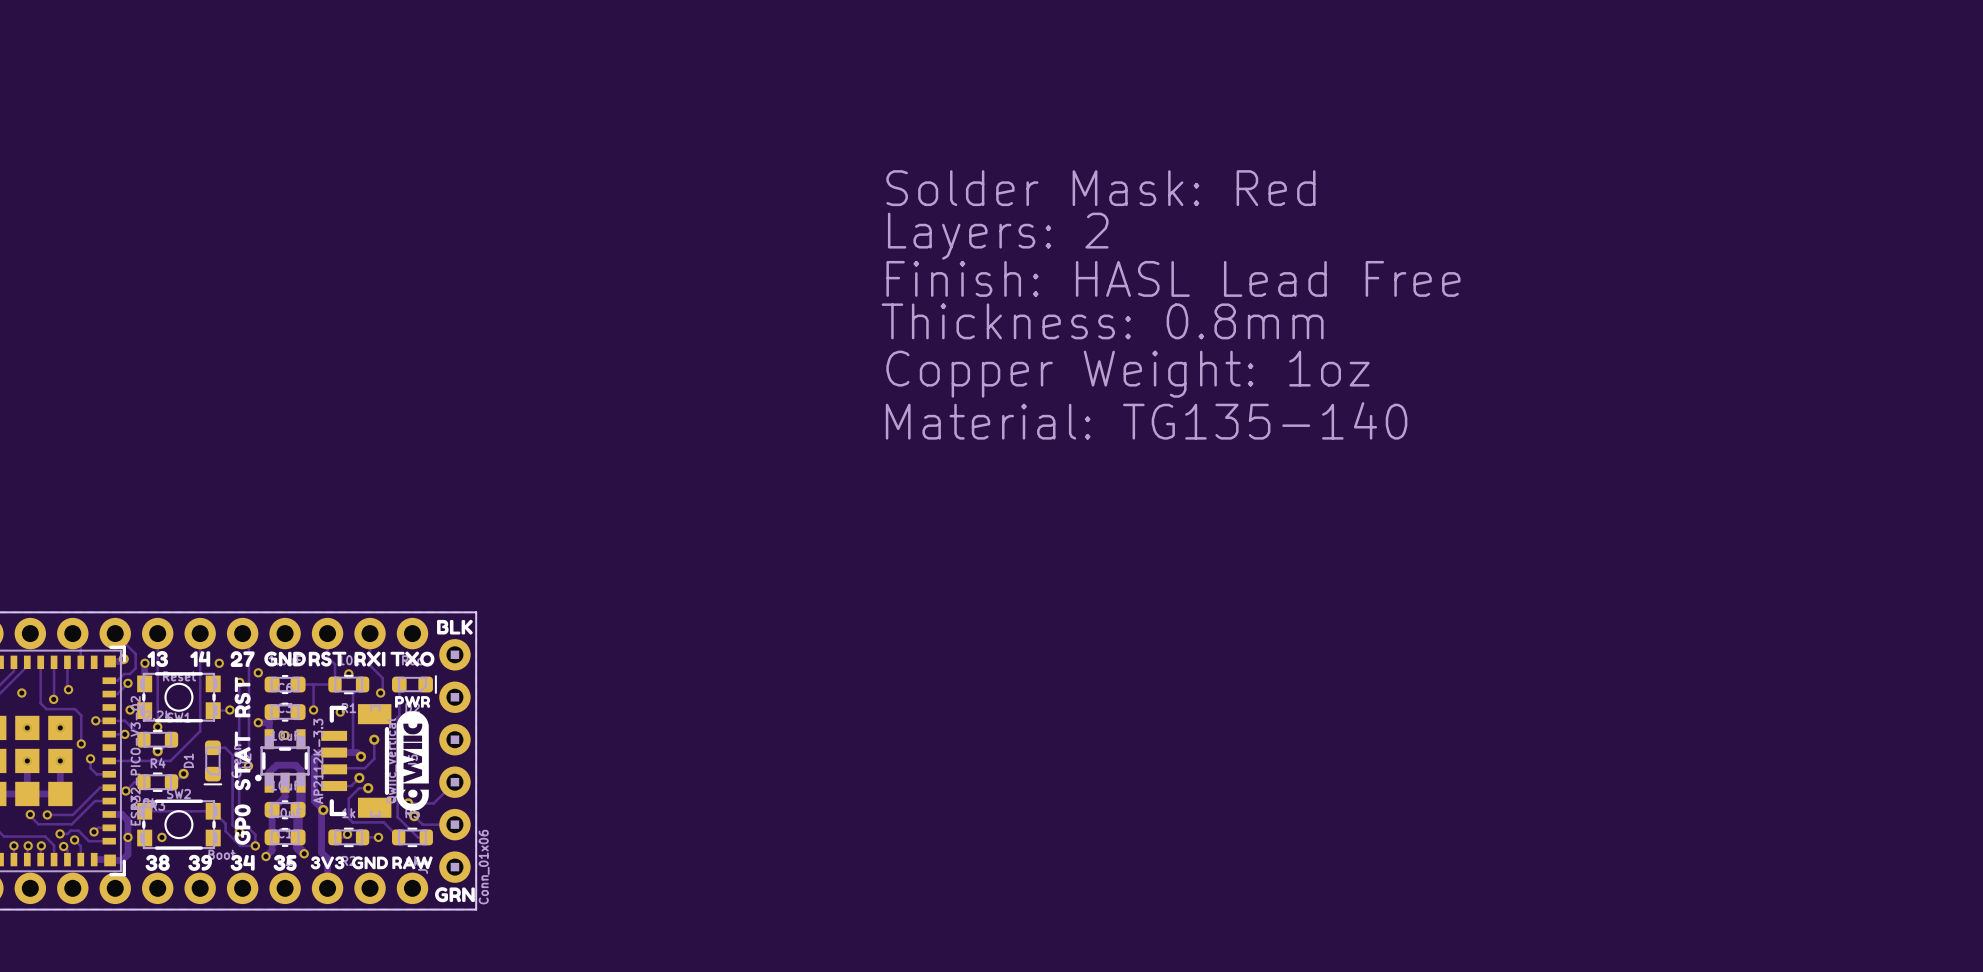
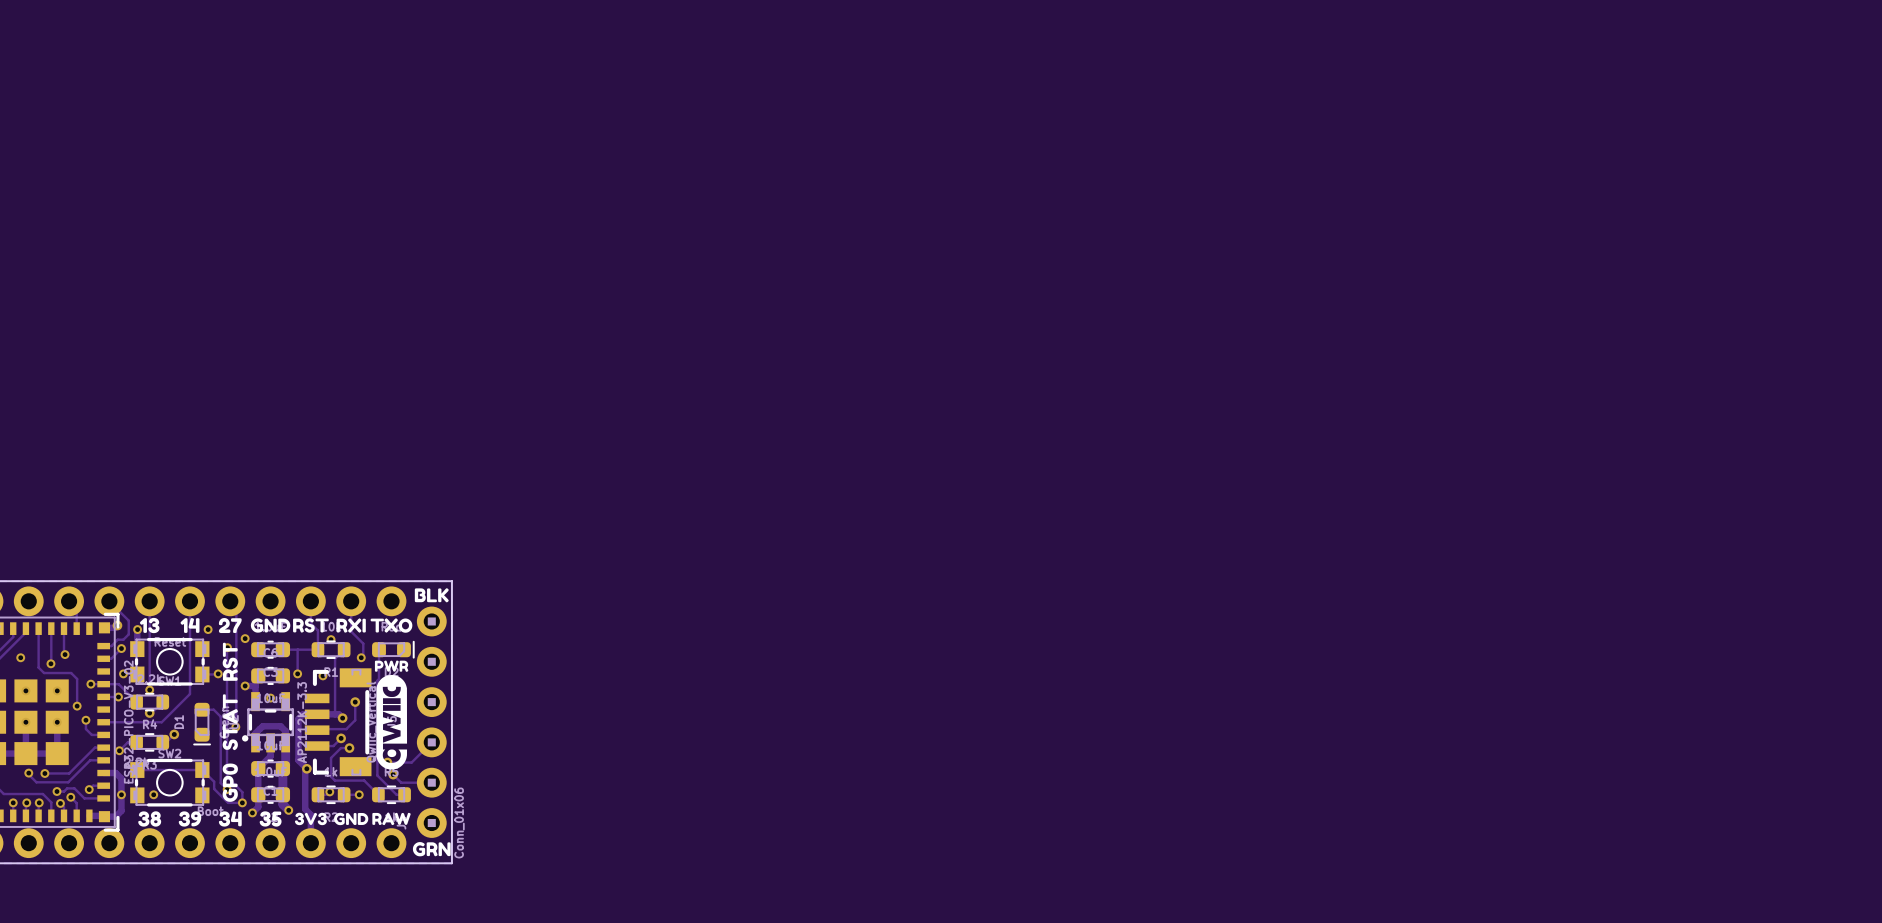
text: Solder Mask: Red (1100, 188) -> none
text: Layers: 2 (998, 236) -> none
text: Finish: HASL Lead Free (1173, 278) -> none
text: Thickness: 0.8mm (1102, 321) -> none
text: Copper Weight: 1oz (1128, 374) -> none
text: Material: TG135-140 (1146, 420) -> none

